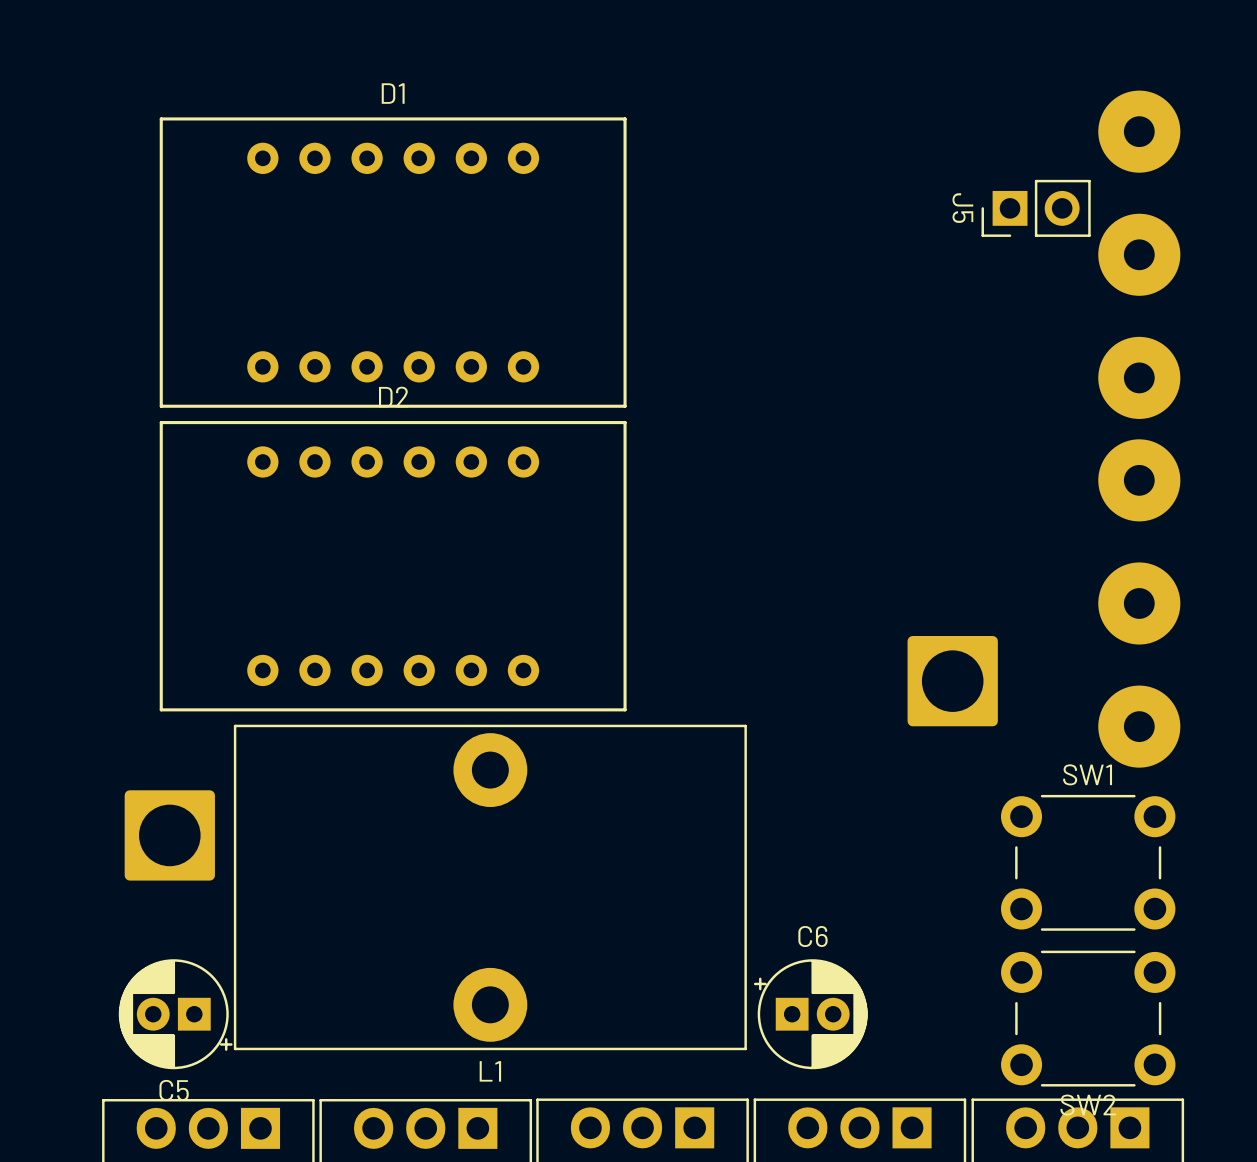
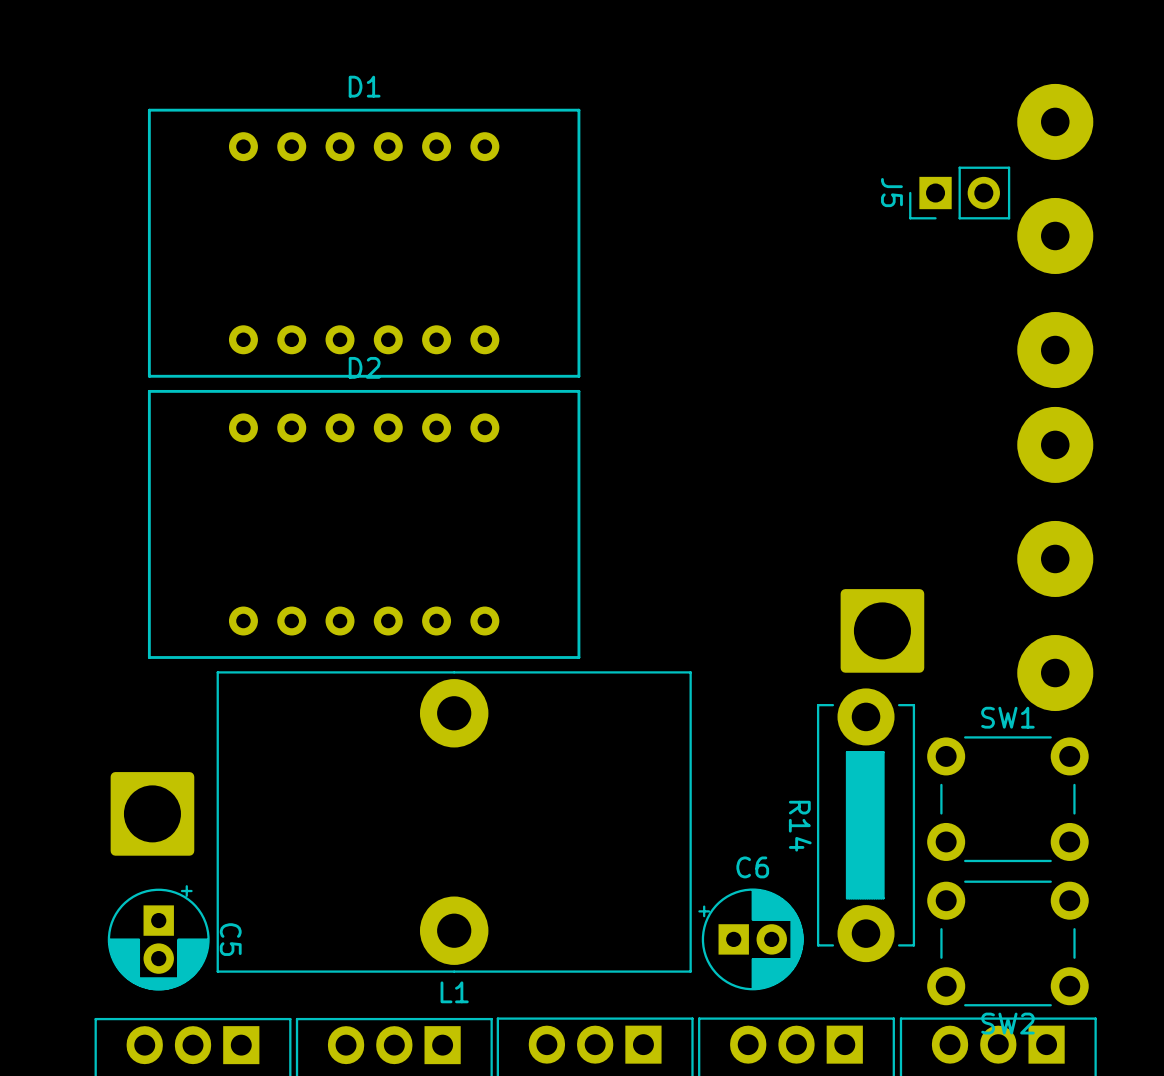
part position: (169, 835) -> (152, 813)
R14: none -> (866, 825)
C5 rotation: 0° (175, 1014) -> 90° counterclockwise (158, 937)

